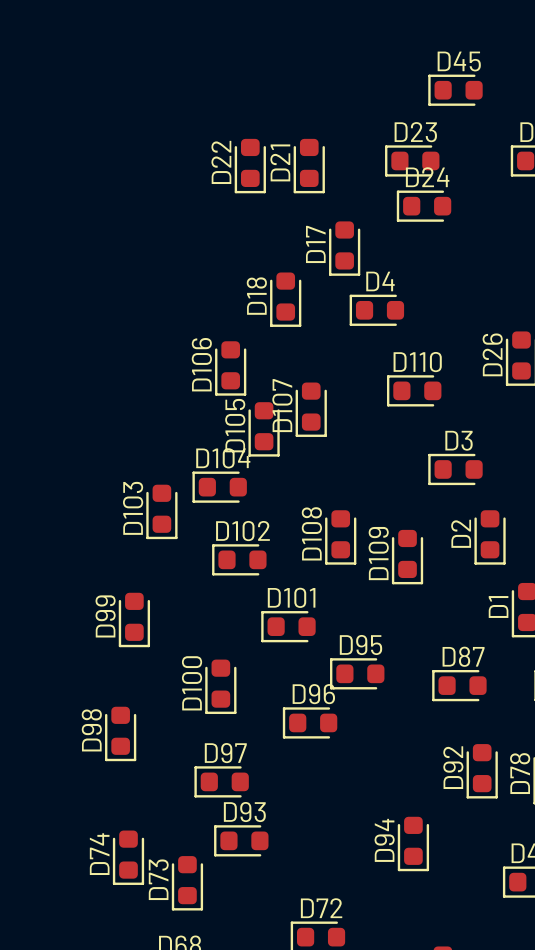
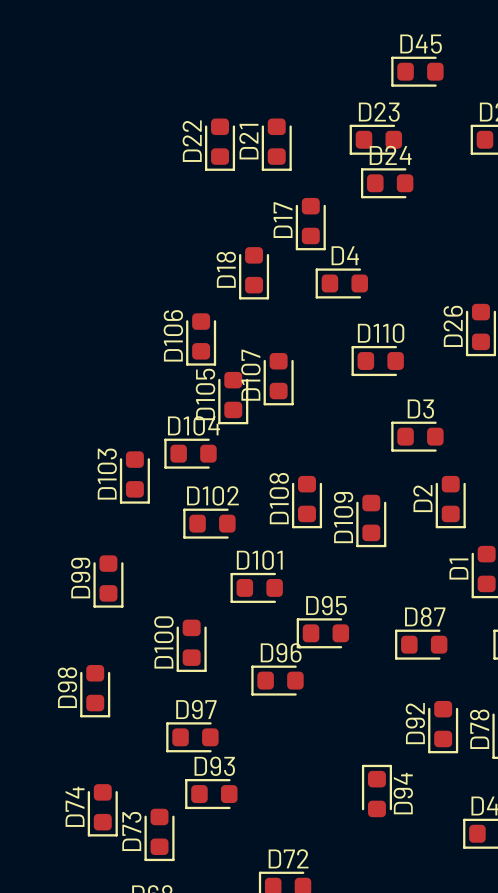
D94 rotation: 0° (413, 843) -> 180° (376, 791)

